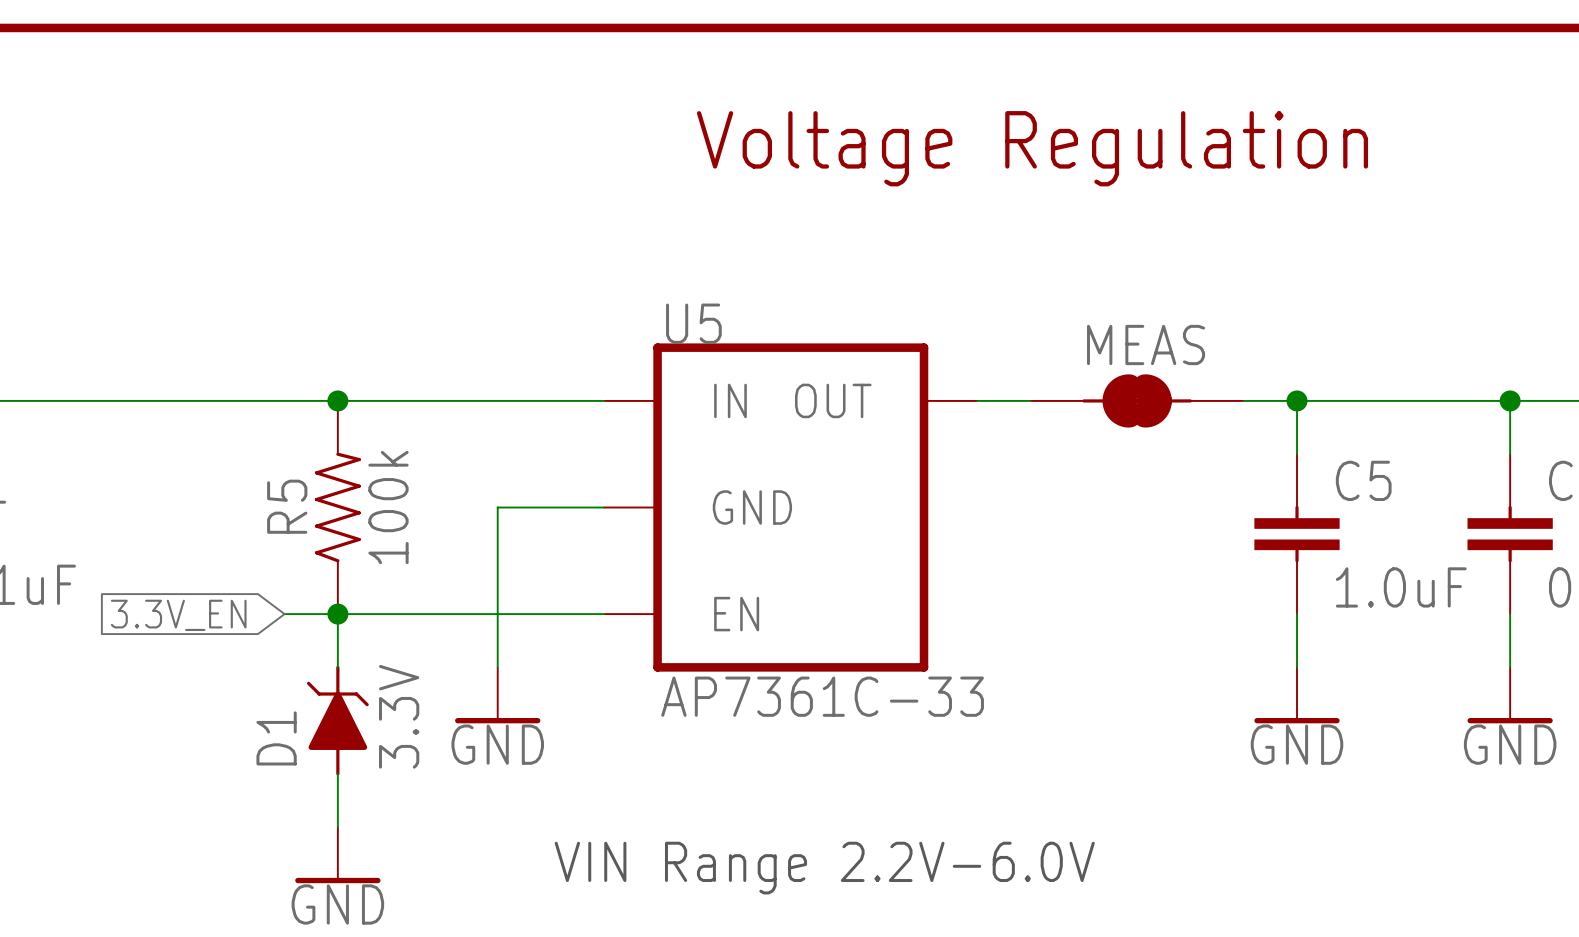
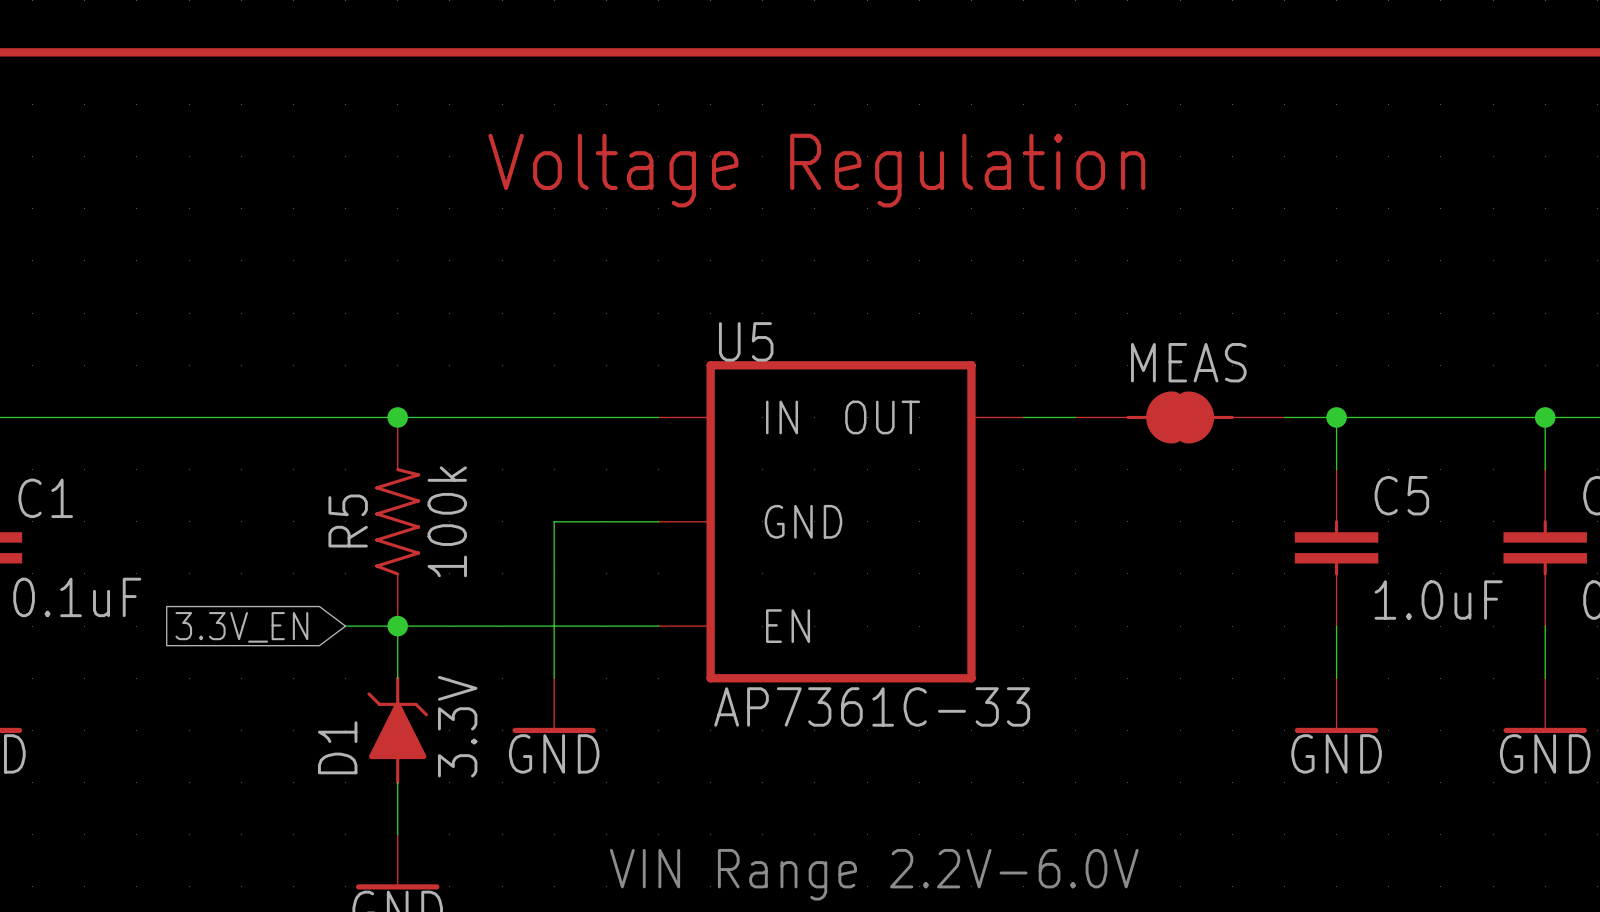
text position: Voltage Regulation (1032, 148) -> Voltage Regulation (816, 170)

